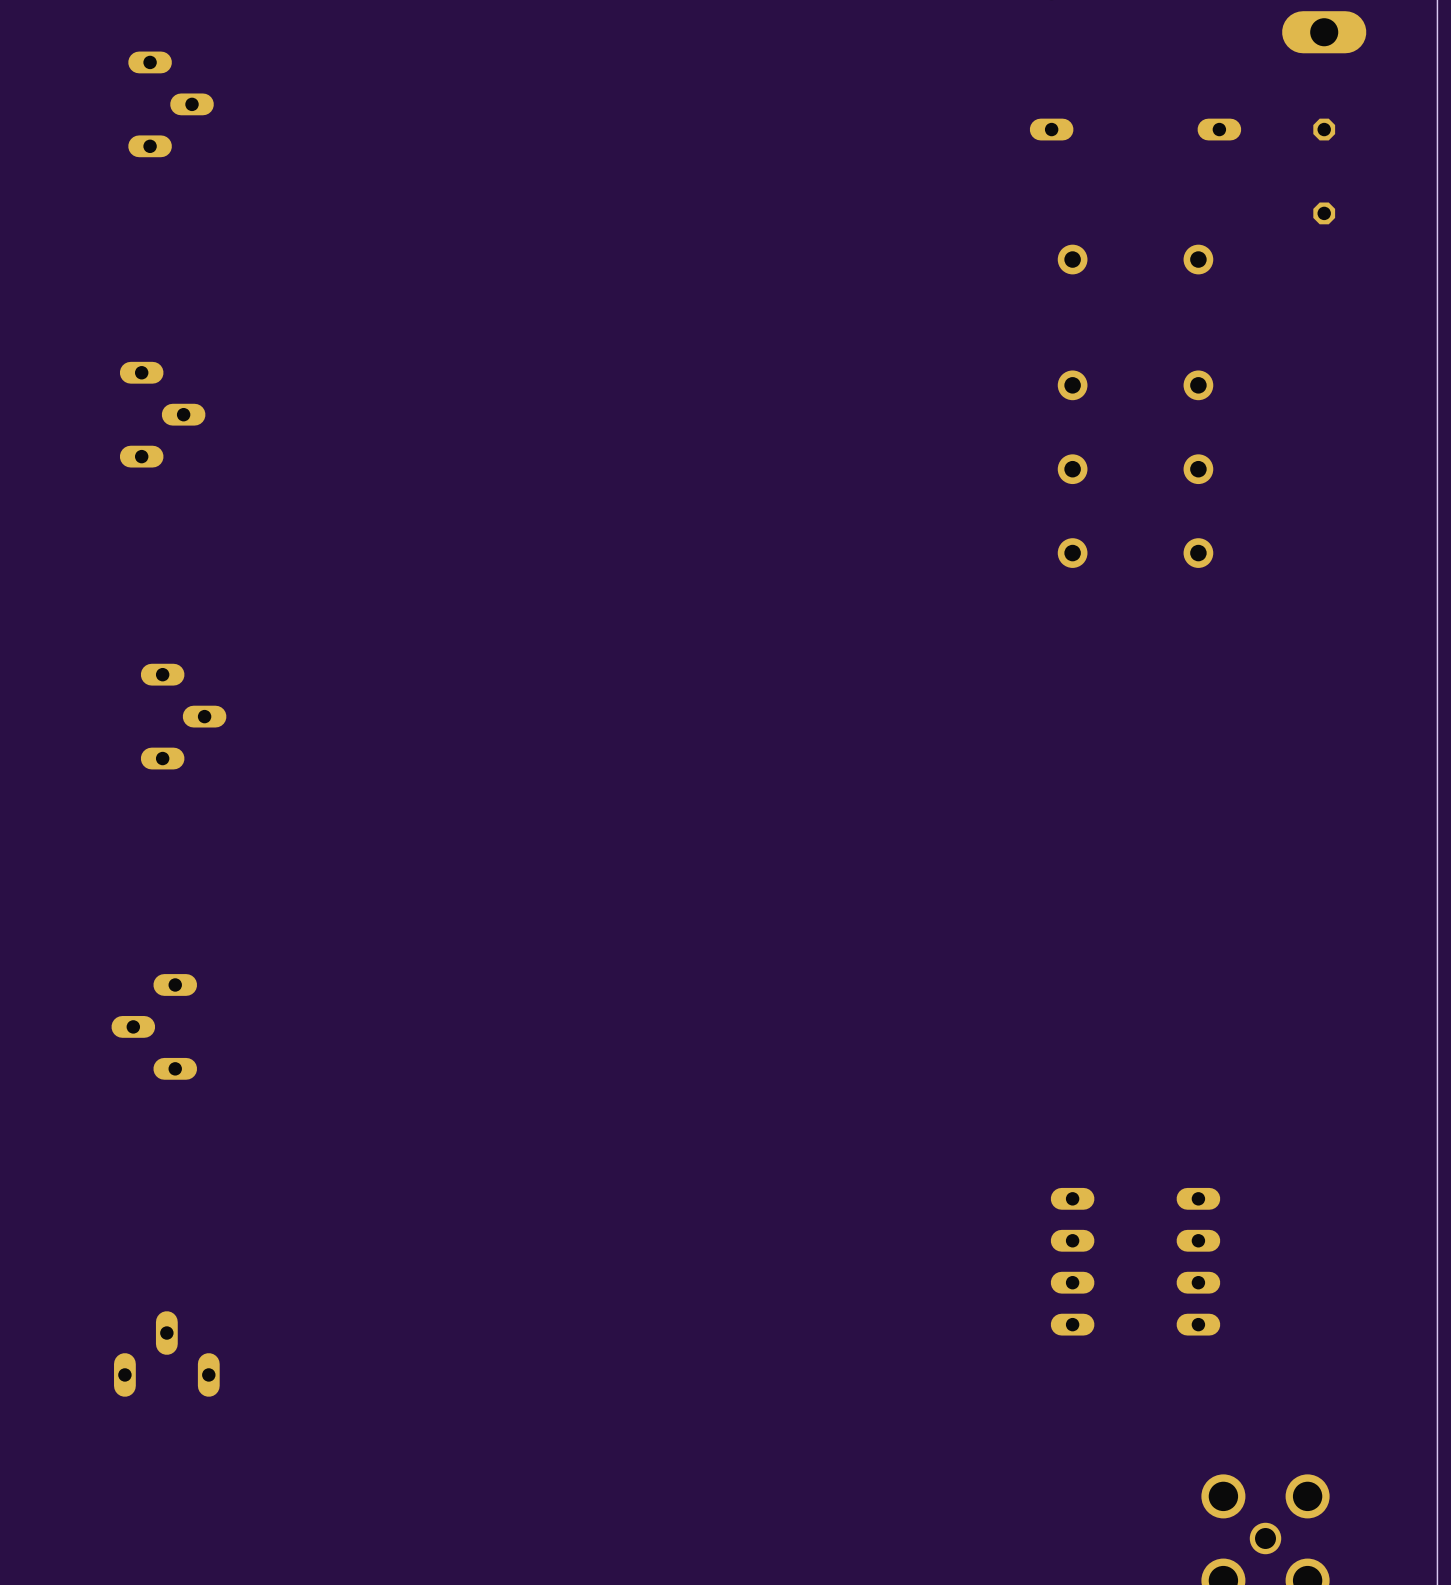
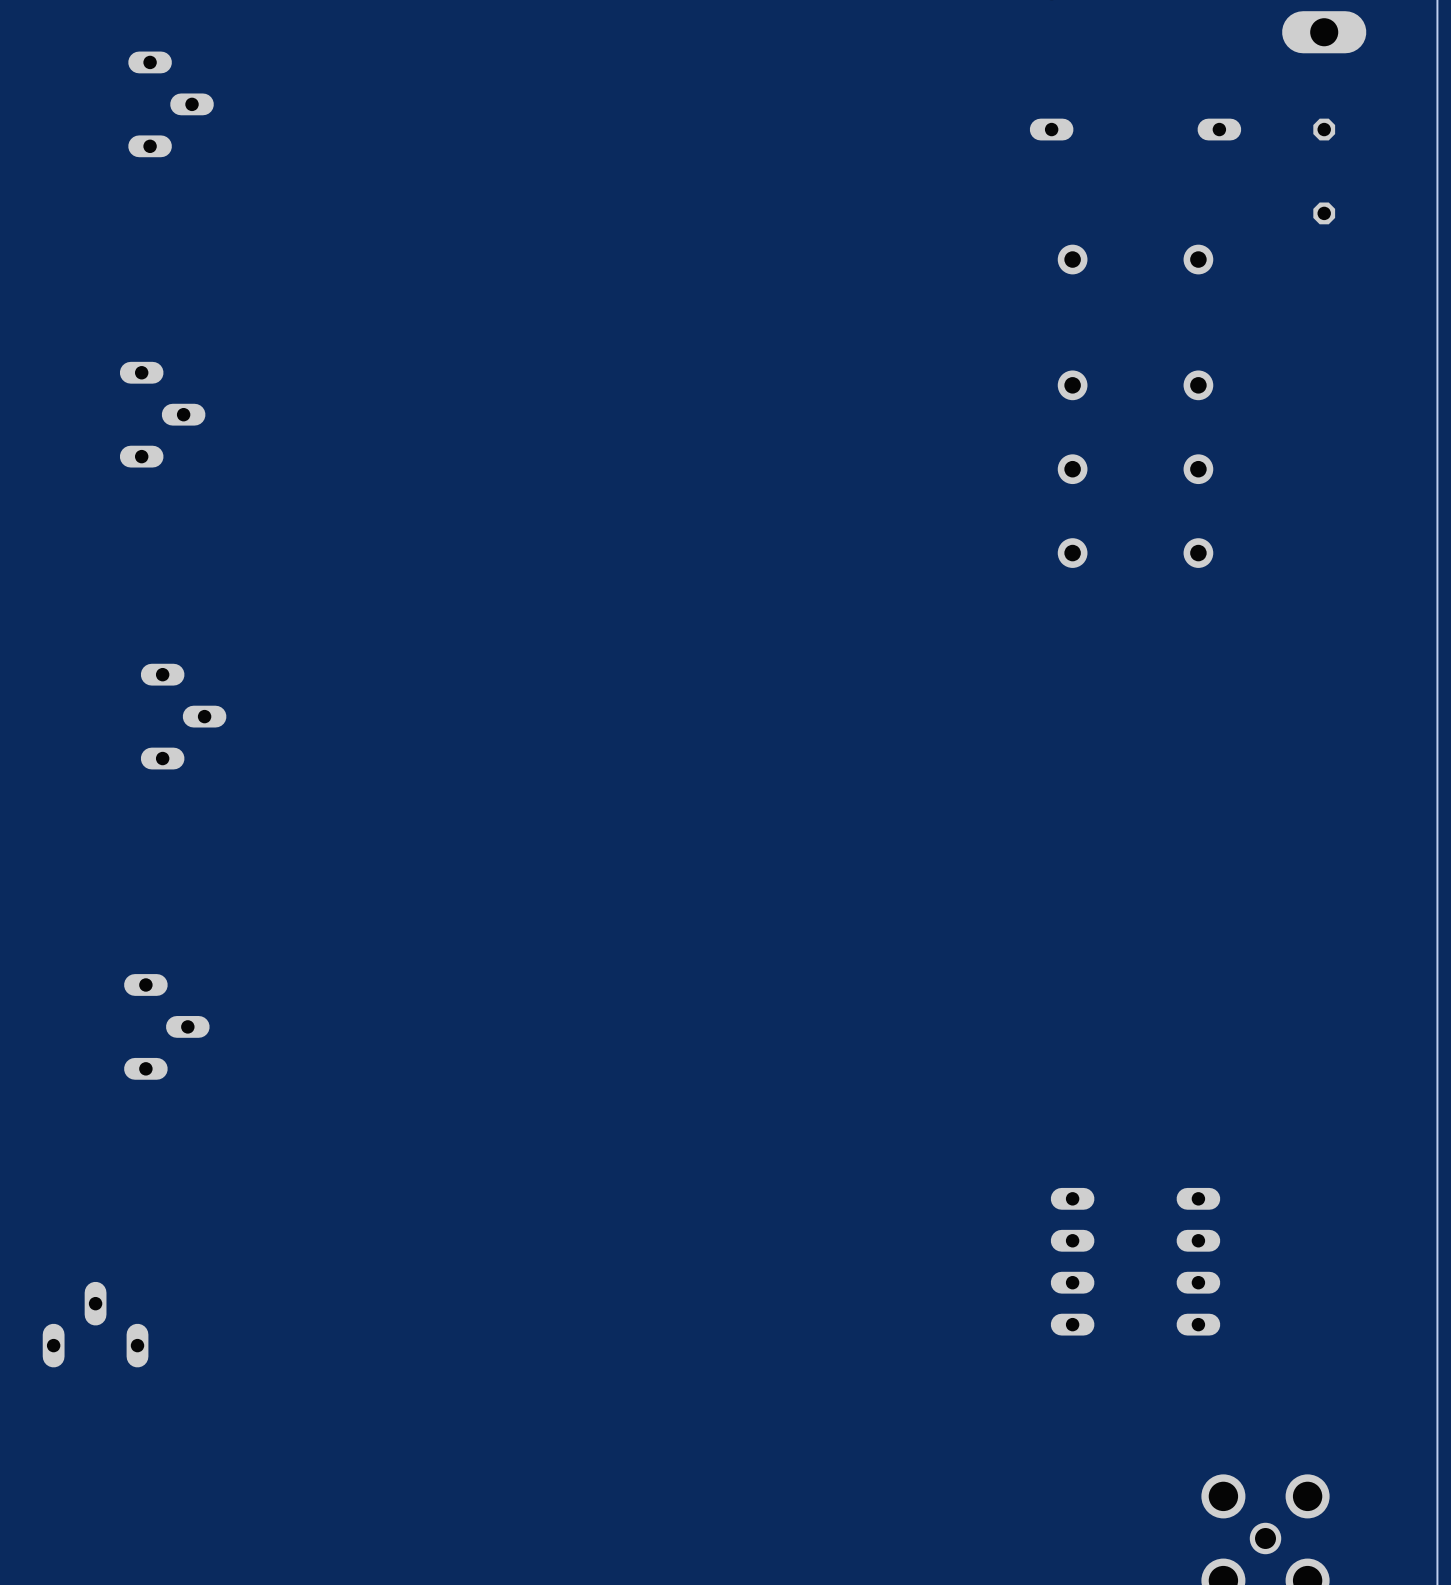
part rotation: 0° (154, 1026) -> 180° (166, 1026)
part position: (166, 1353) -> (95, 1324)

